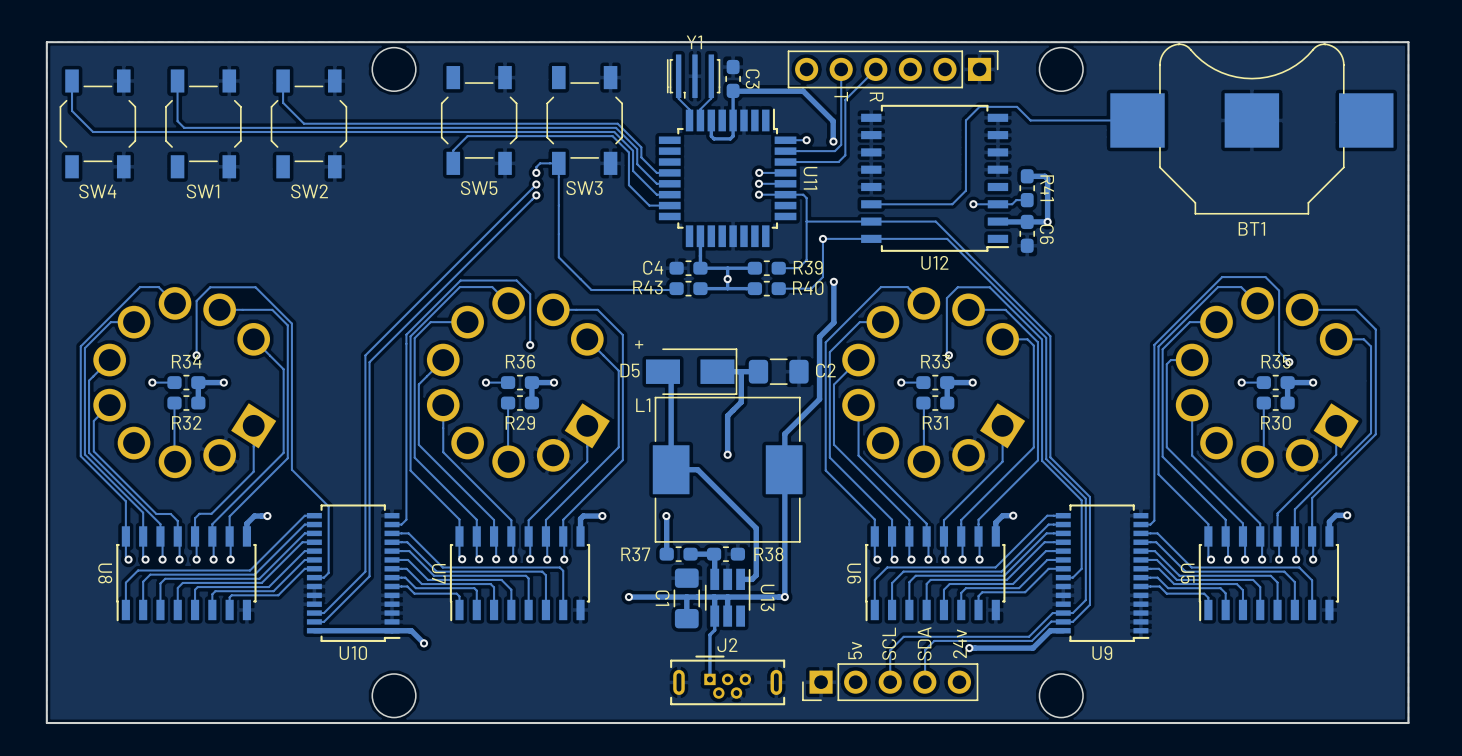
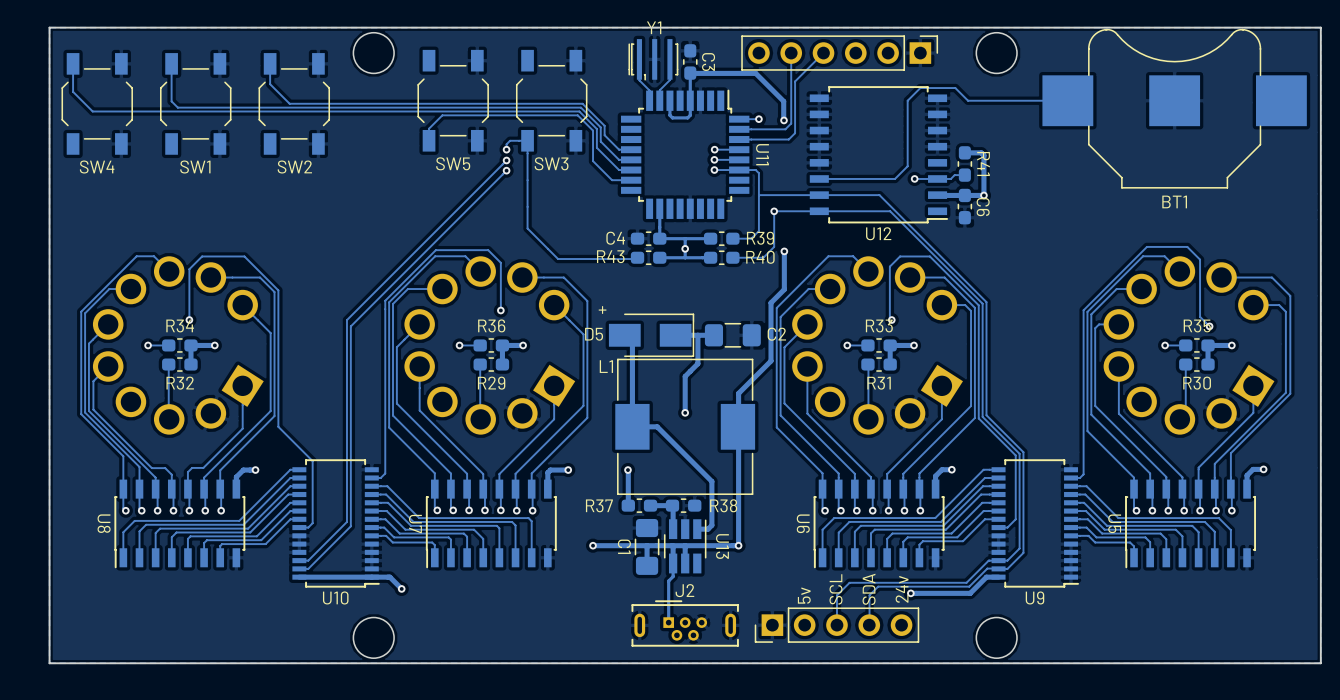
text: T (841, 96) -> none
text: R (876, 97) -> none

